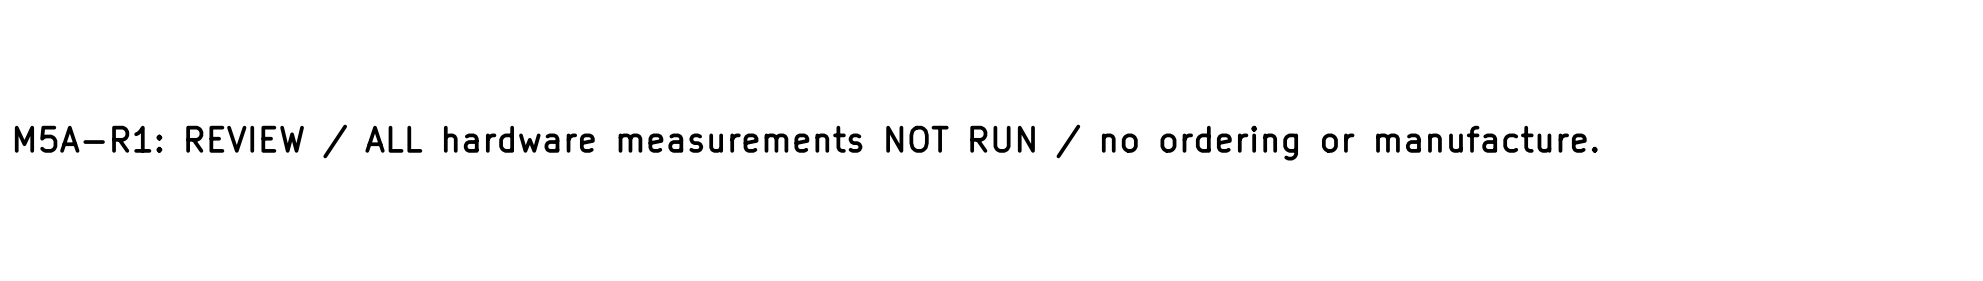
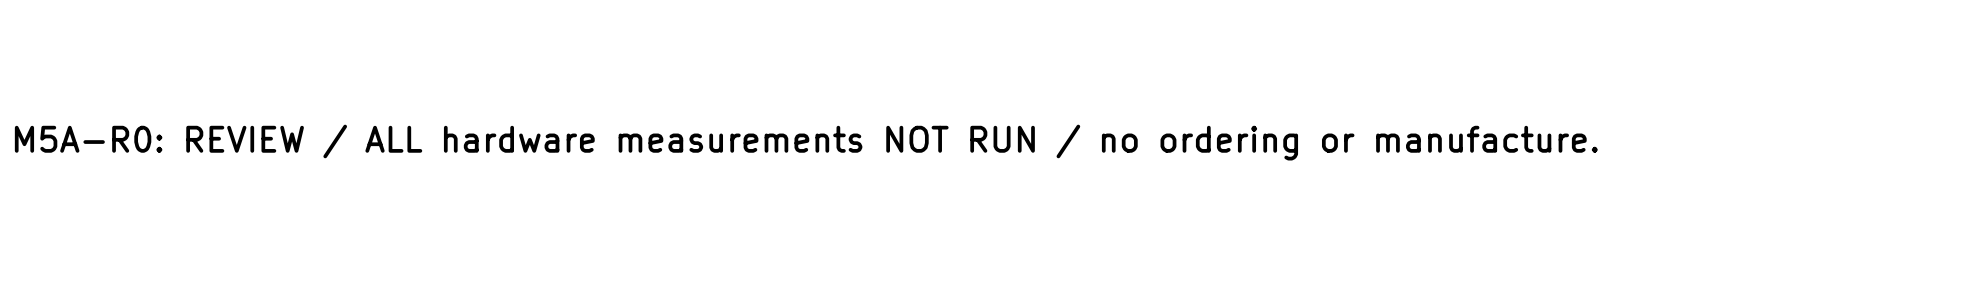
text: M5A-R1: REVIEW / ALL hardware measurements NOT RUN / no ordering or manufacture. (806, 142) -> M5A-R0: REVIEW / ALL hardware measurements NOT RUN / no ordering or manufacture. (806, 142)

